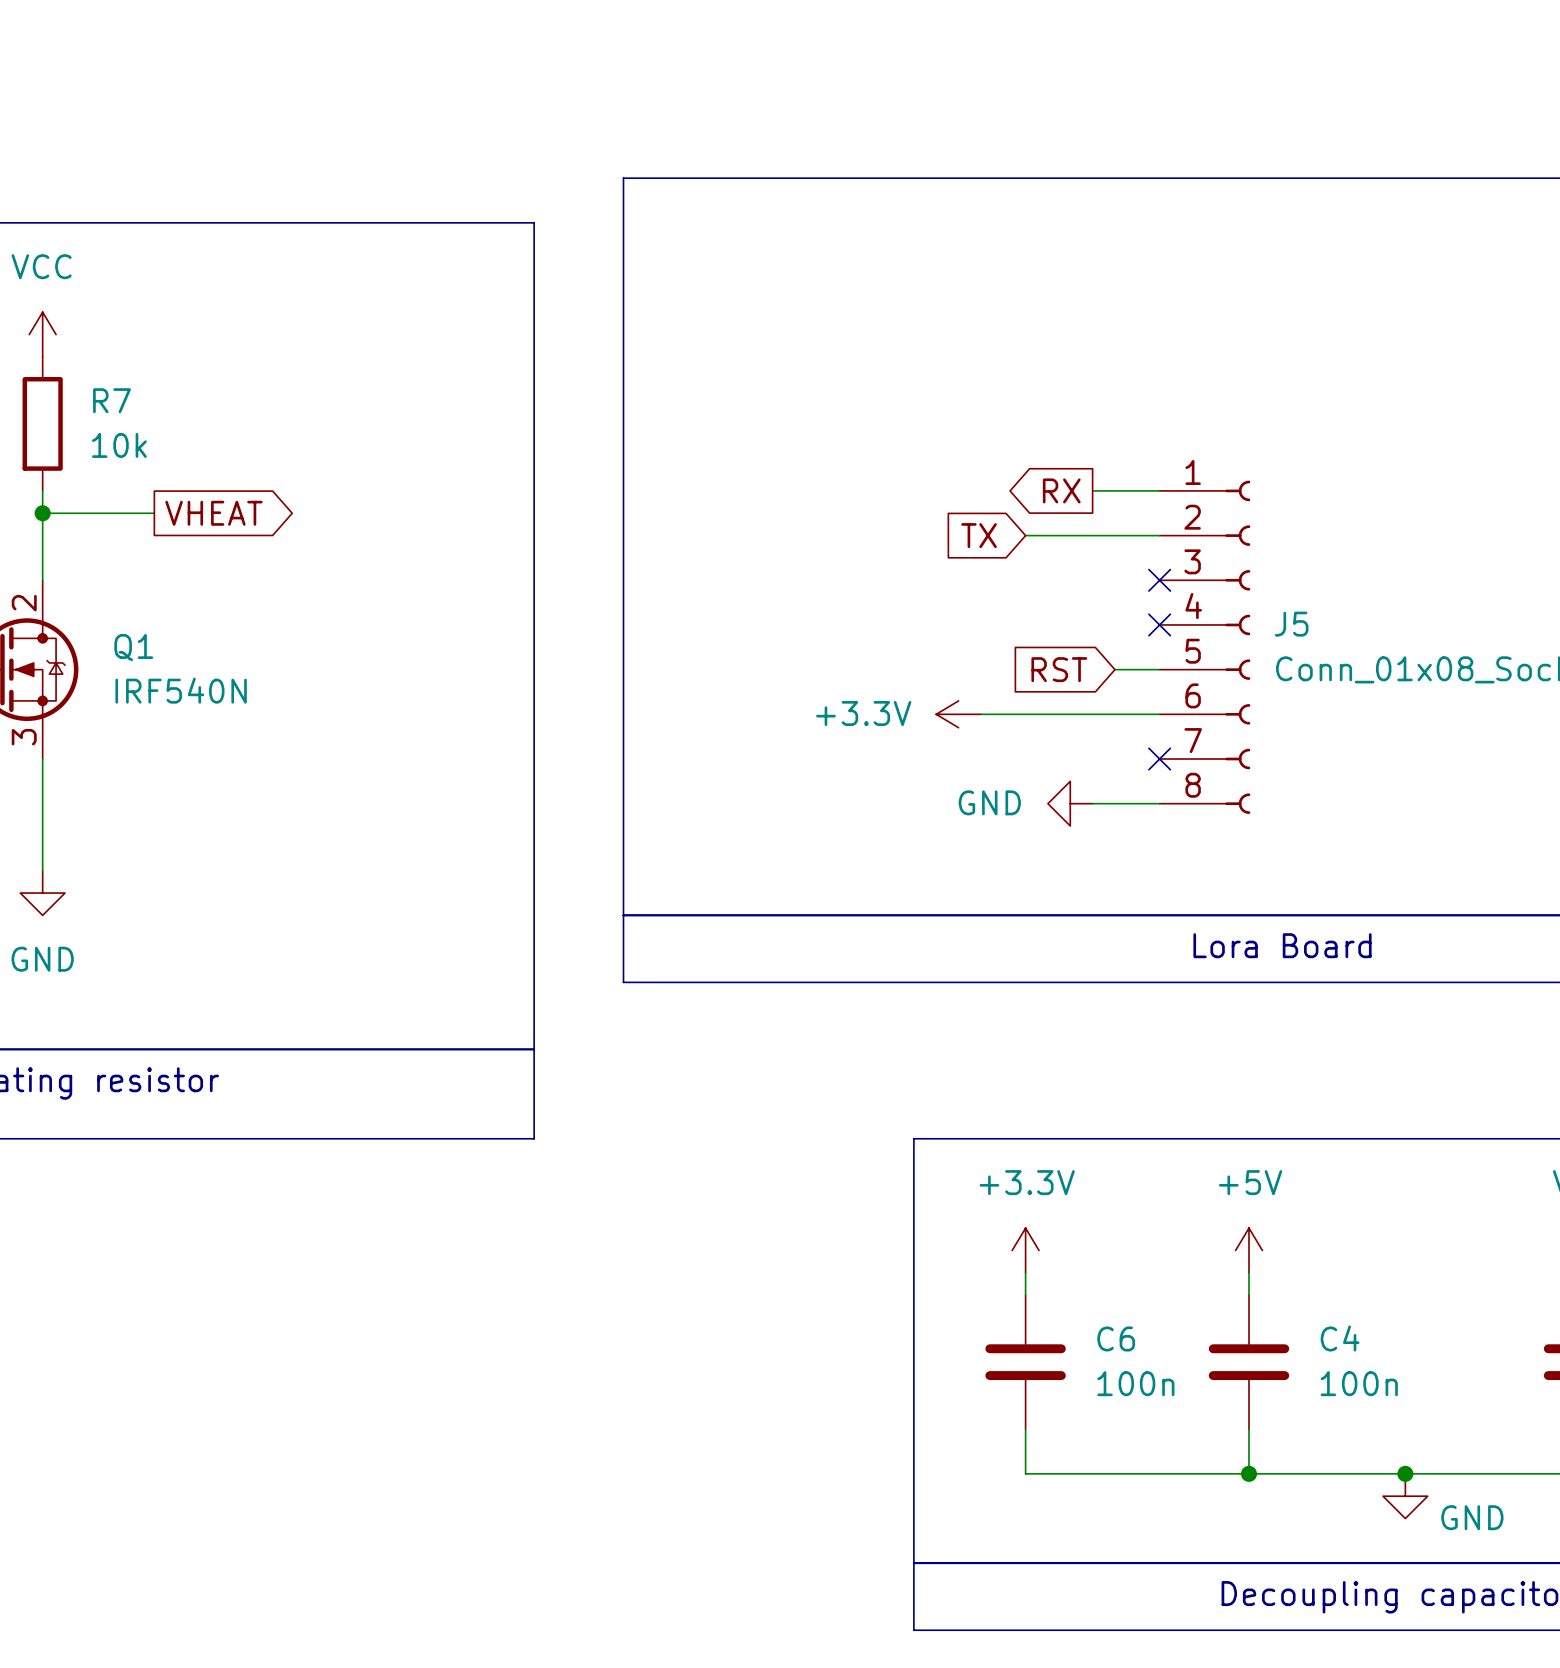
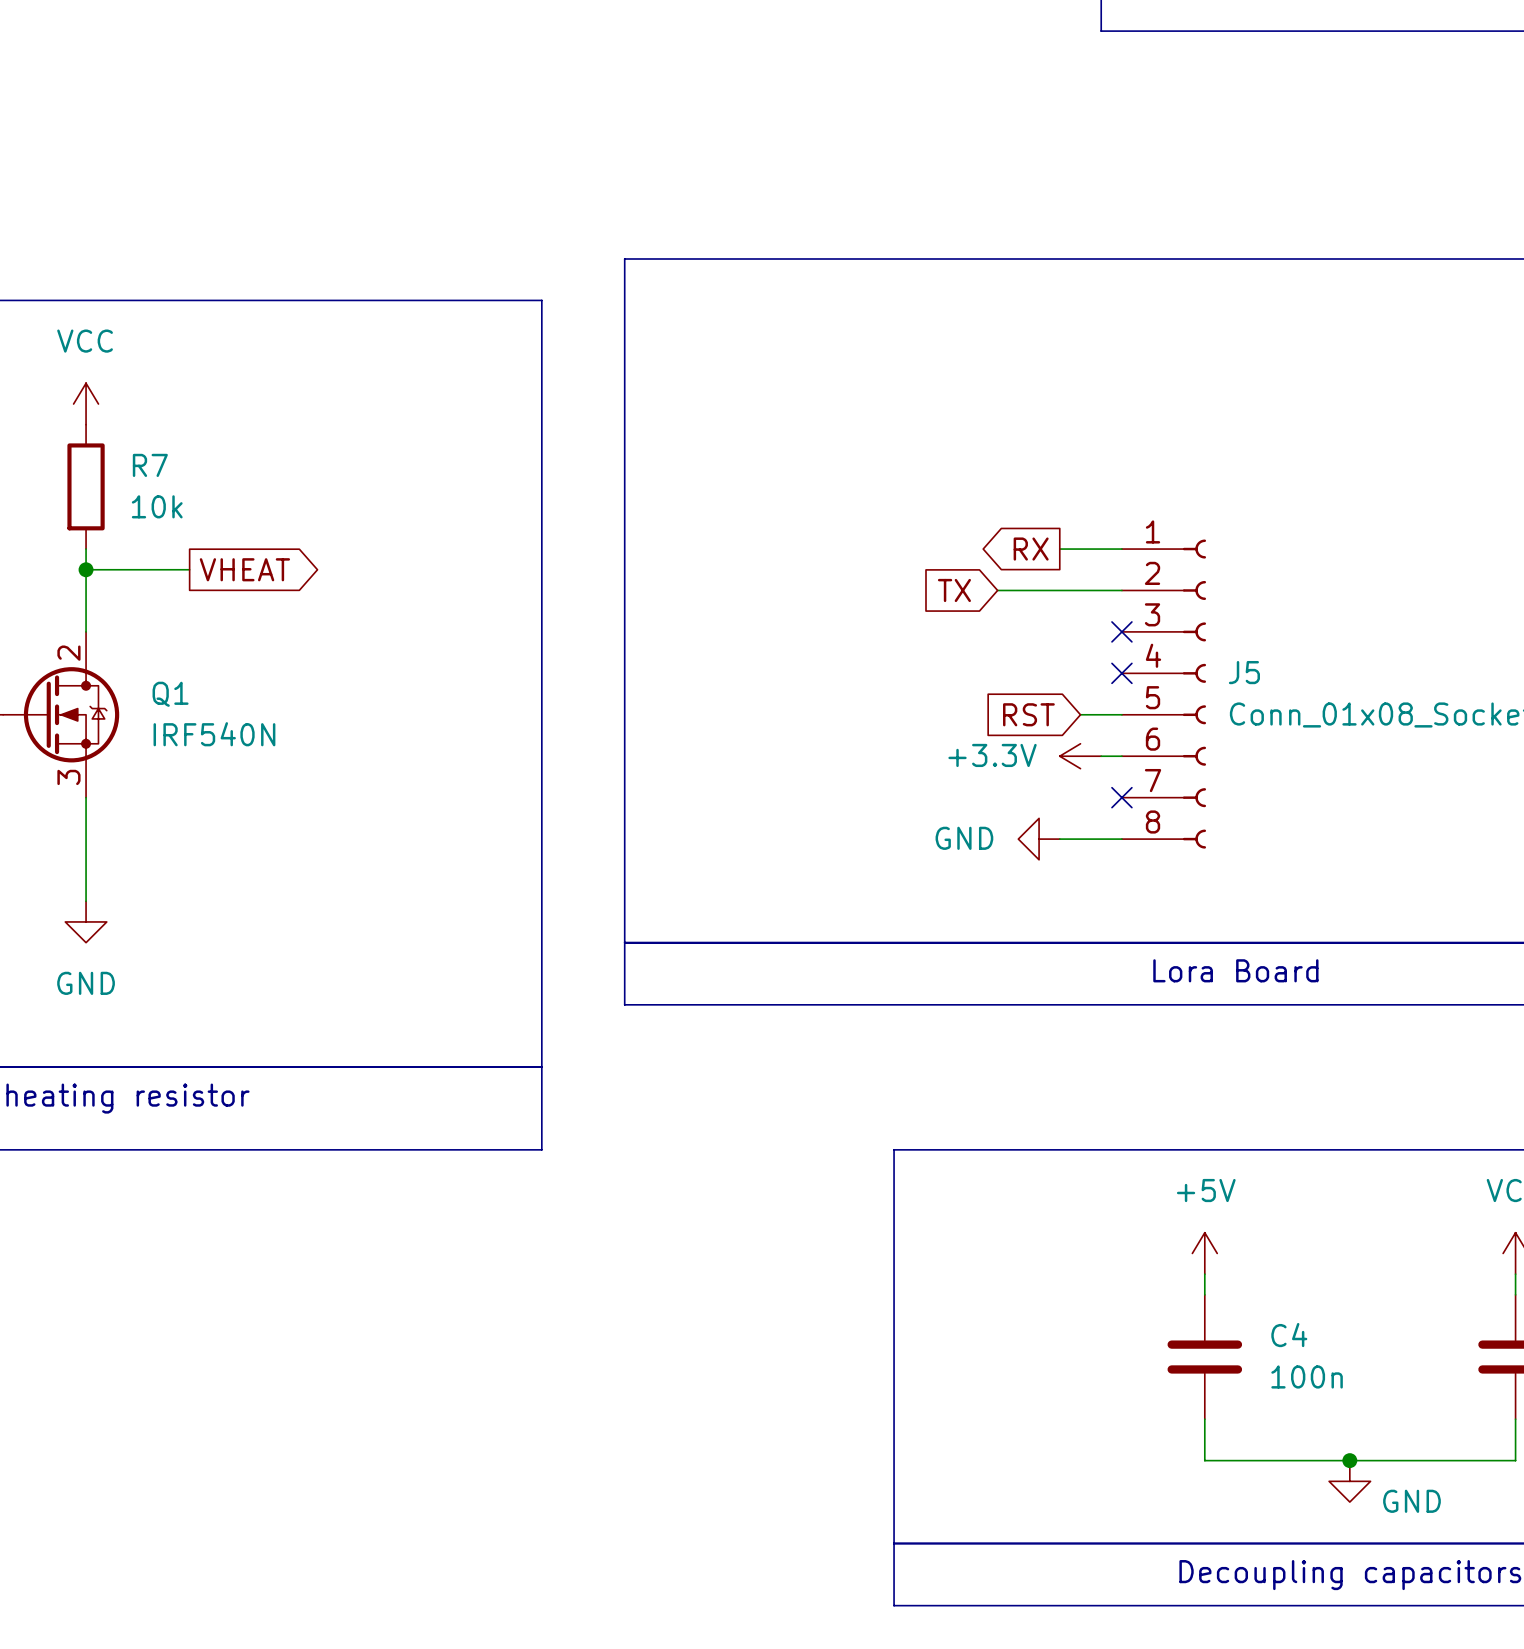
power symbol position: +3.3V (958, 714) -> +3.3V (1080, 756)
wire: (980, 714) (1137, 714) -> none
power symbol: +3.3V (1025, 1250) -> none
wire: (1025, 1272) (1025, 1295) -> none
C6: 100n (1025, 1362) -> none
wire: (1025, 1429) (1025, 1473) (1248, 1473) -> none
junction: (1248, 1473) -> none

